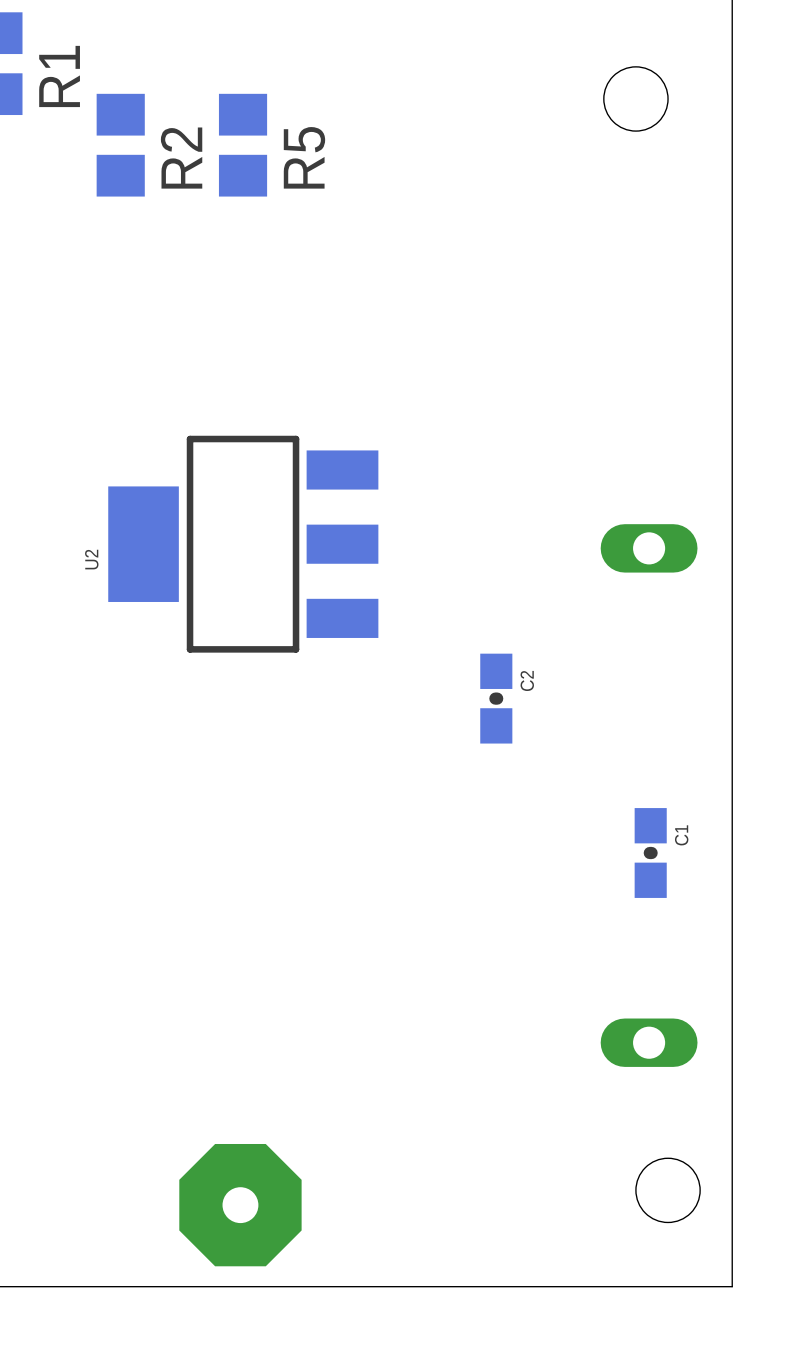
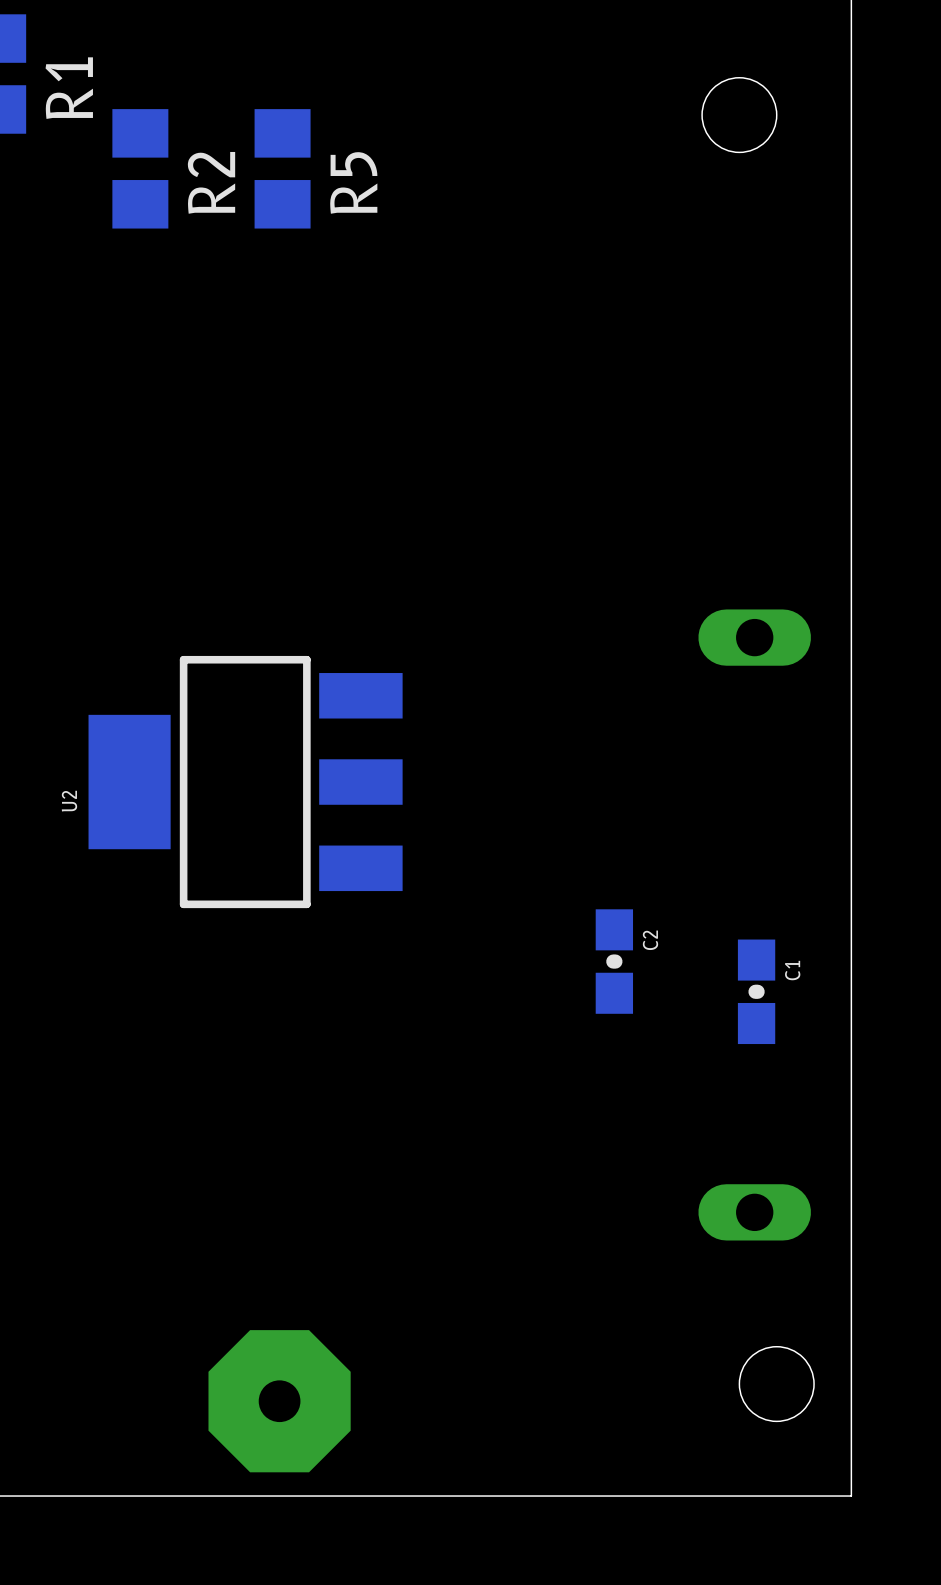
U2 position: (243, 544) -> (245, 782)
C2 position: (496, 698) -> (614, 961)

